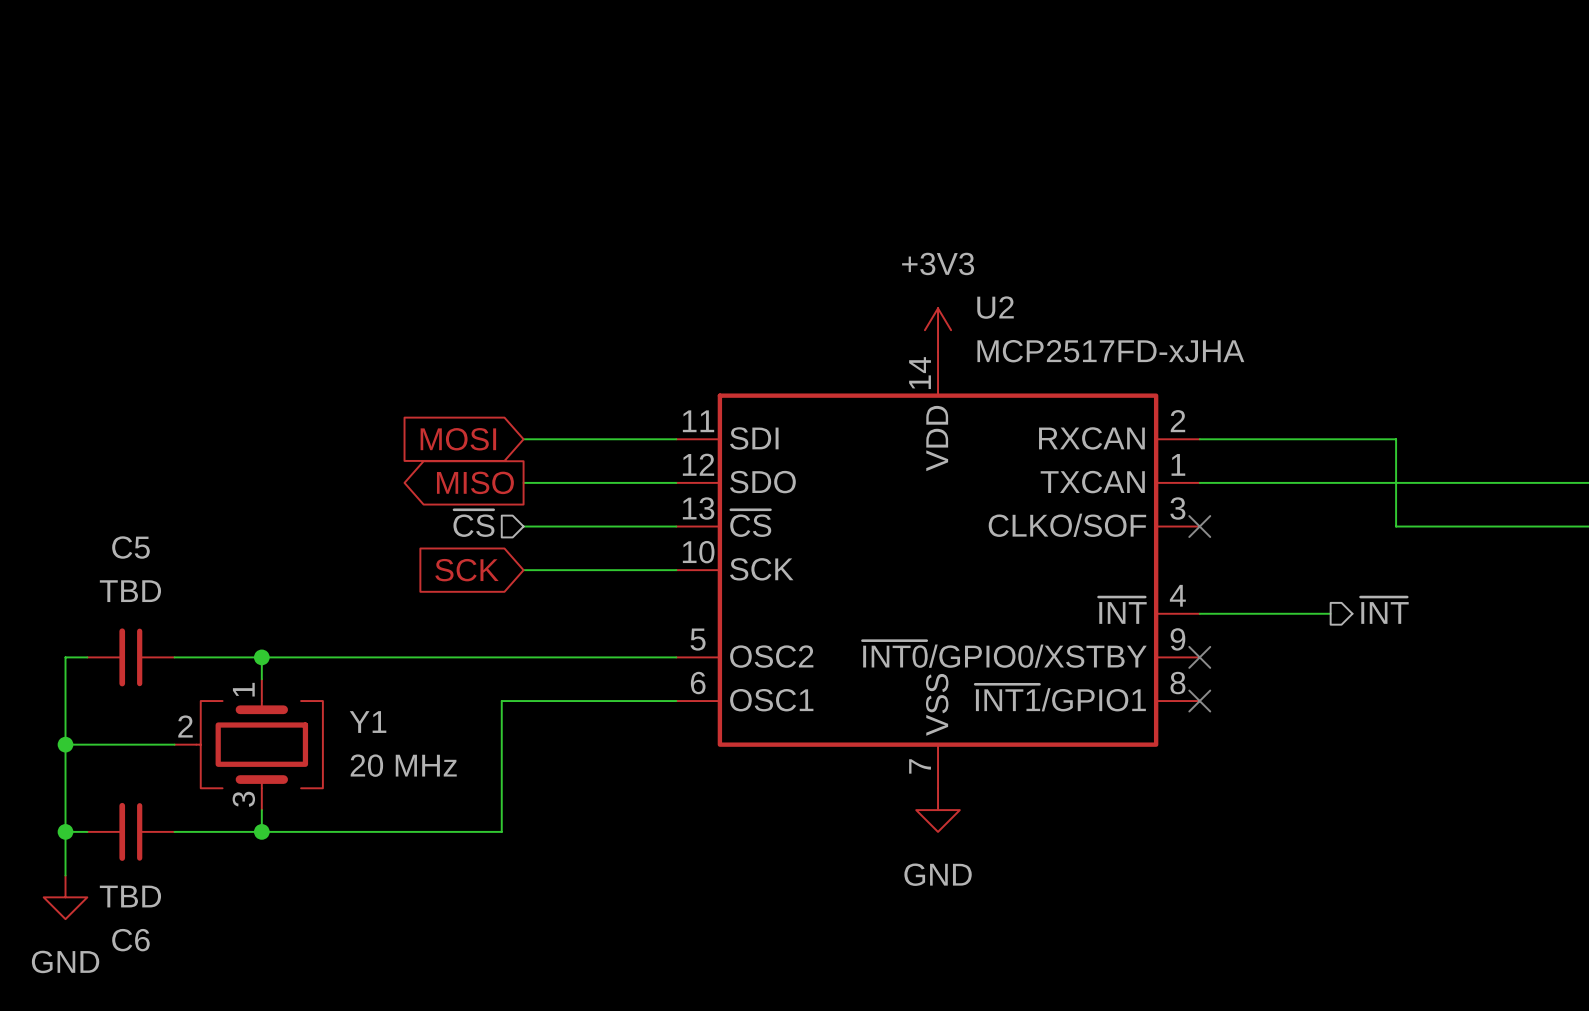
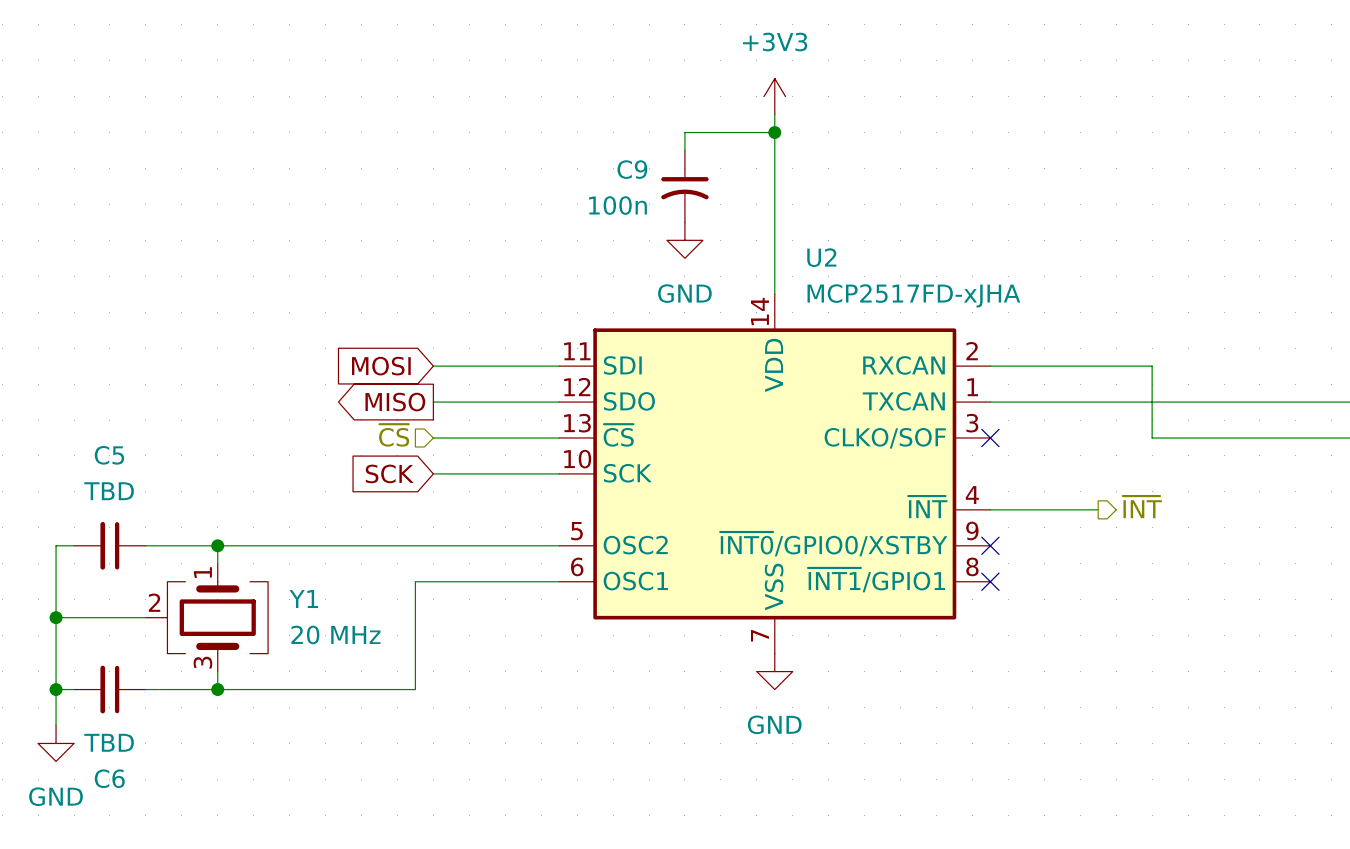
wire: none -> (774, 114) (774, 294)
wire: none -> (774, 132) (684, 132) (684, 150)
junction: none -> (774, 132)
C9: none -> 100n (684, 186)
power symbol: none -> GND (684, 240)
power symbol position: +3V3 (938, 330) -> +3V3 (774, 96)

